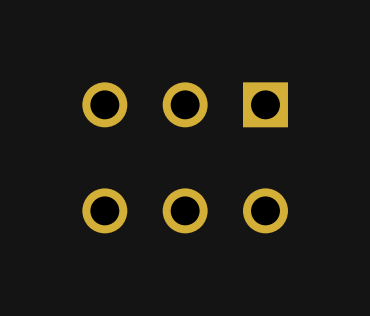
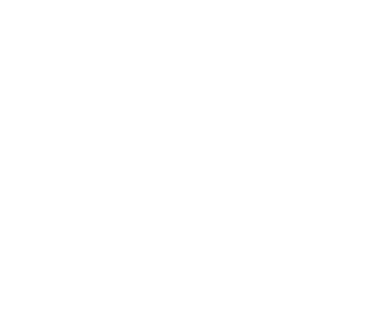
part: (185, 157) -> none

